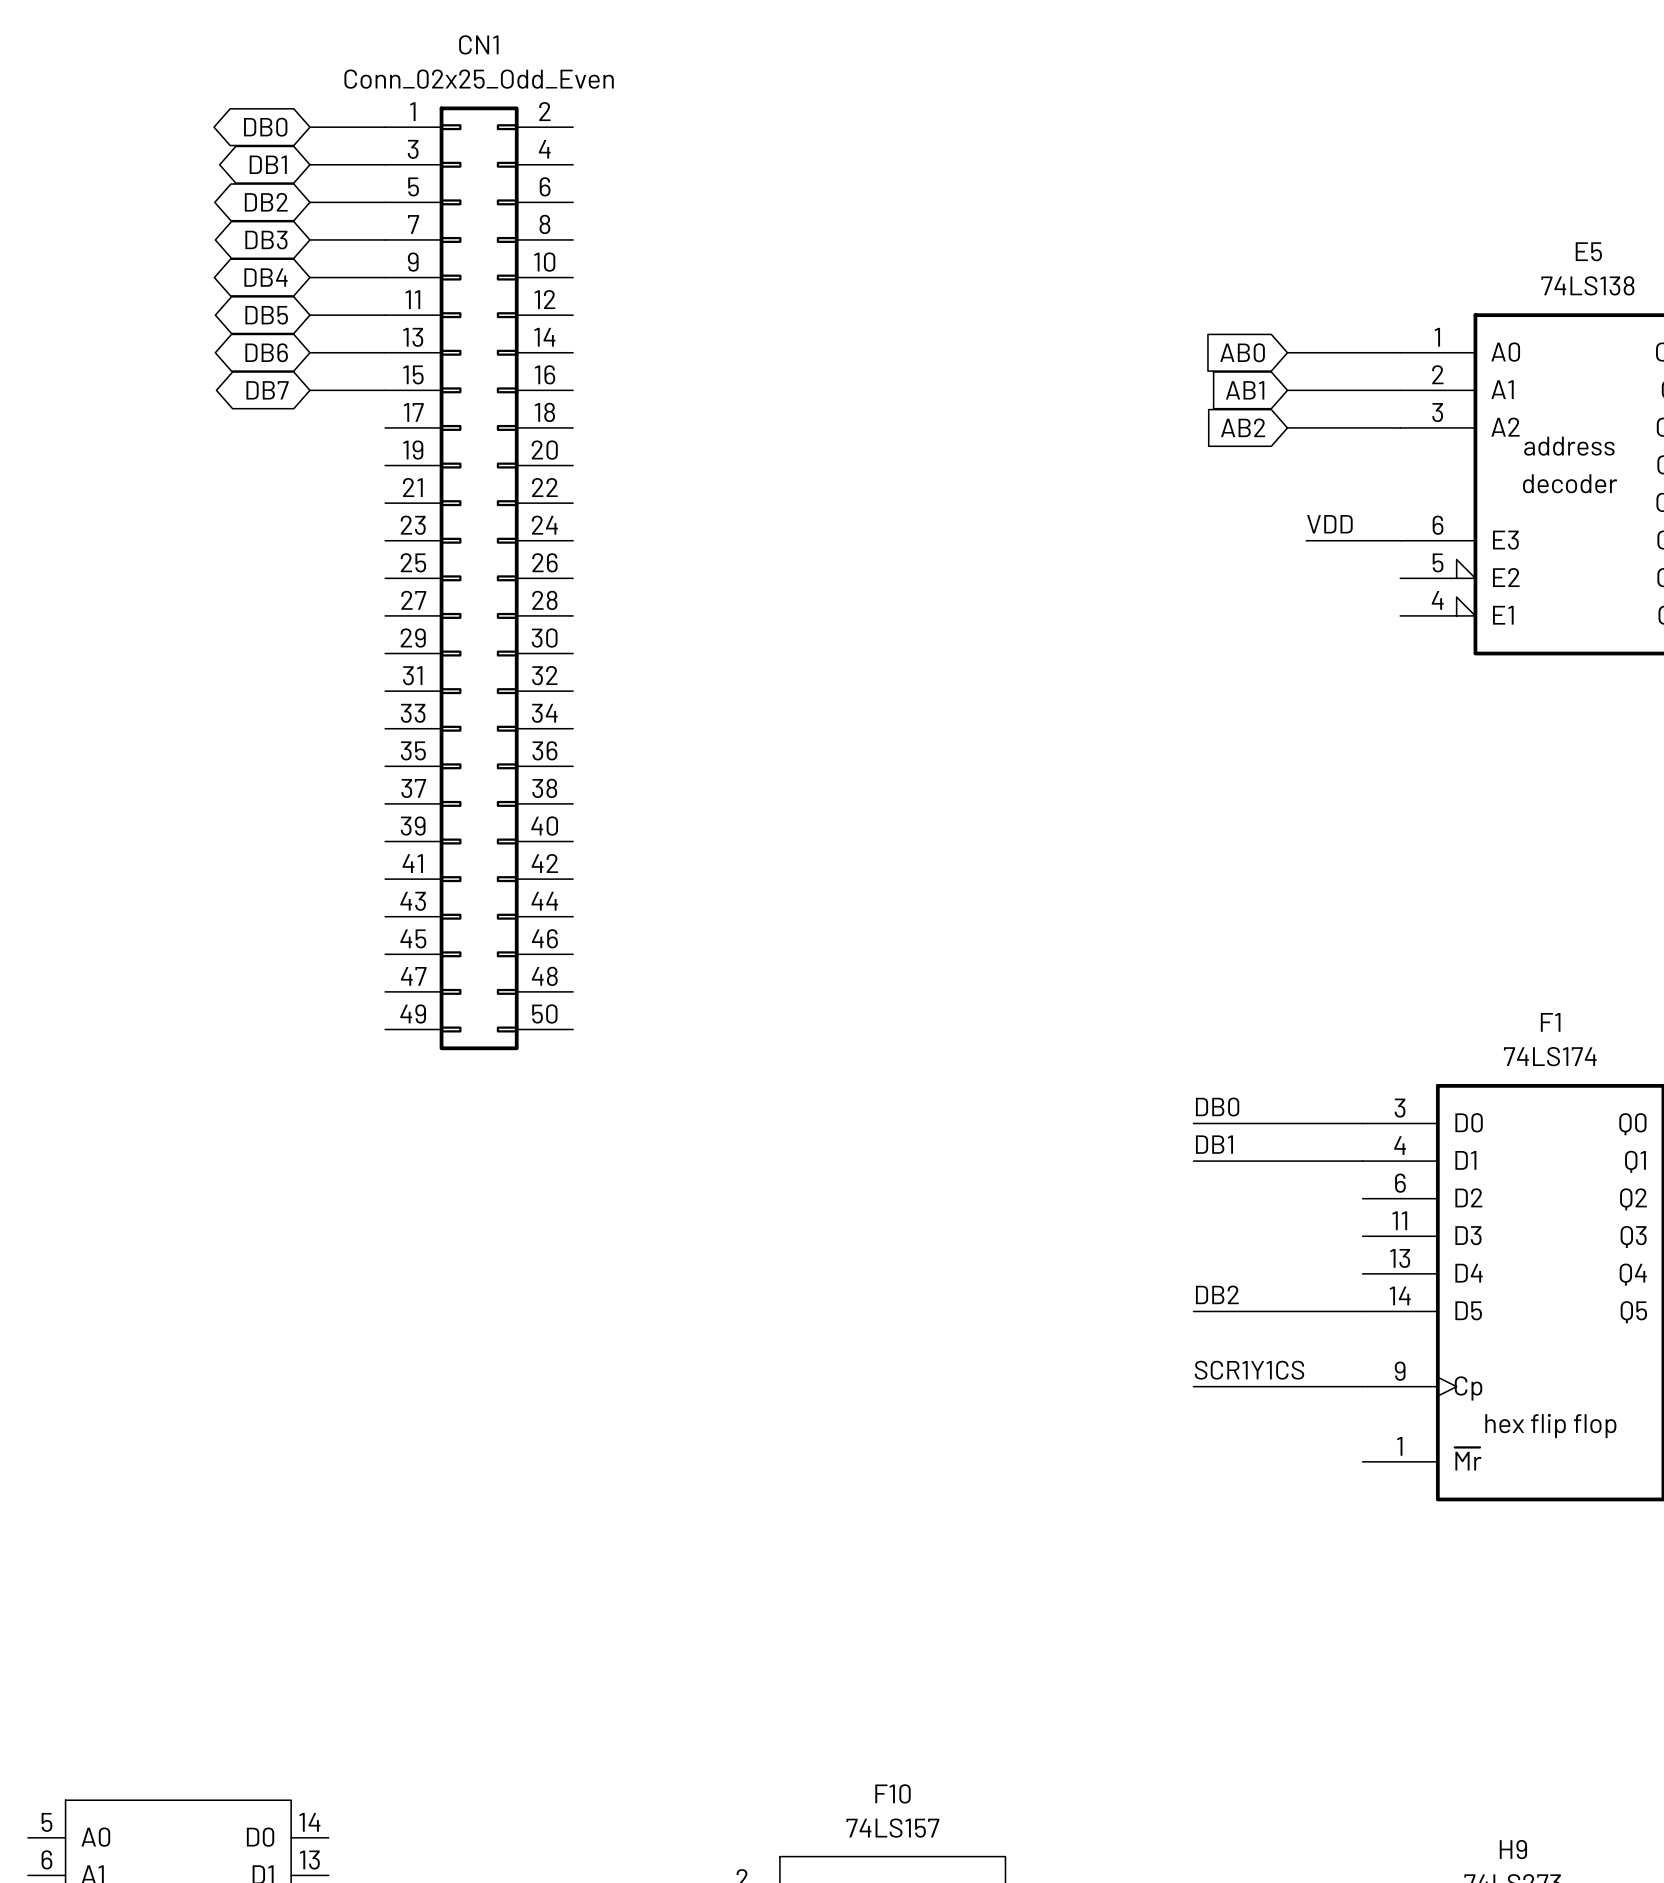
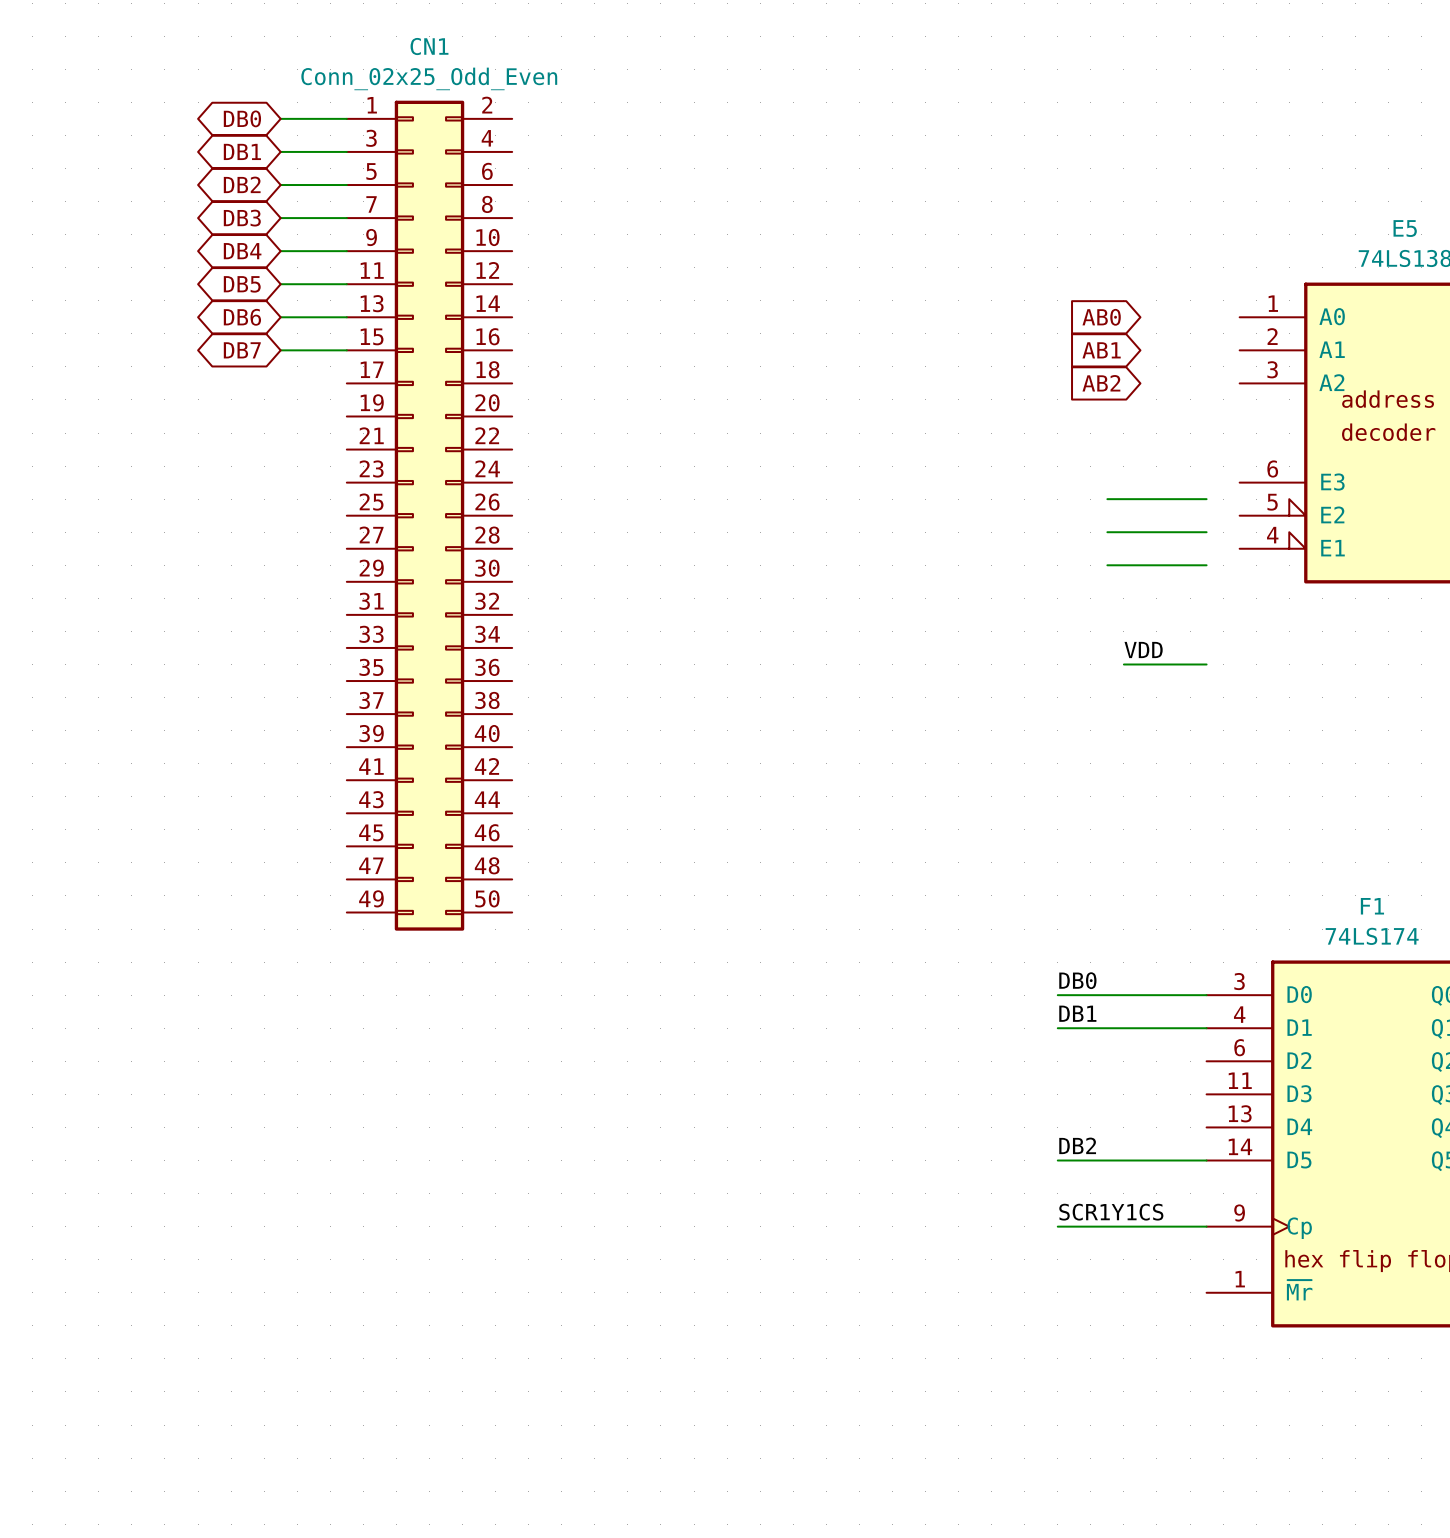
wire: (1287, 352) (1400, 352) -> (1107, 499) (1206, 499)
wire: (1287, 390) (1400, 390) -> (1107, 532) (1206, 532)
wire: (1287, 427) (1400, 427) -> (1107, 565) (1206, 565)
label position: VDD (1329, 524) -> VDD (1143, 649)
wire: (1306, 540) (1400, 540) -> (1123, 664) (1206, 664)

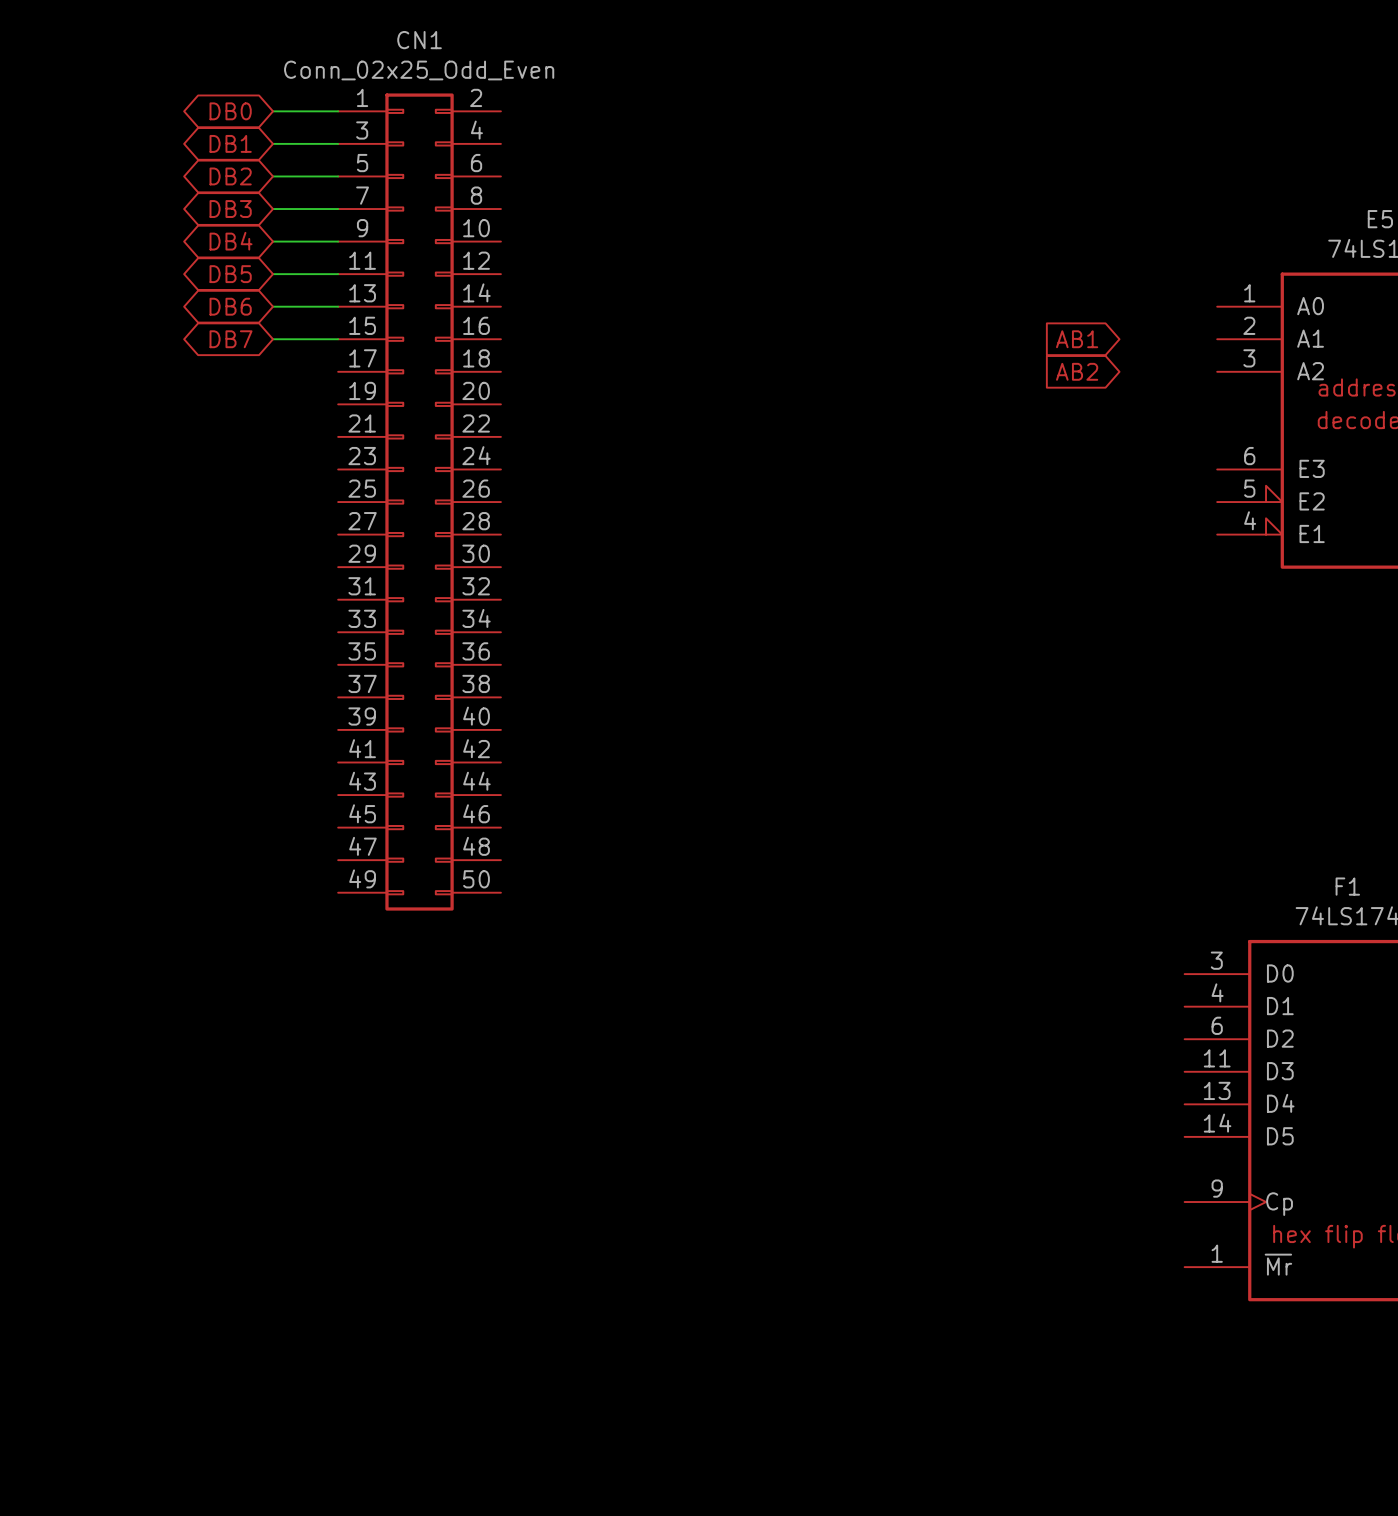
global label: AB0 (1101, 317) -> none
wire: (1107, 499) (1206, 499) -> none
wire: (1107, 532) (1206, 532) -> none
wire: (1107, 565) (1206, 565) -> none
label: VDD (1143, 649) -> none
wire: (1123, 664) (1206, 664) -> none
label: DB0 (1077, 980) -> none
wire: (1057, 995) (1206, 995) -> none
label: DB1 (1077, 1013) -> none
wire: (1057, 1028) (1206, 1028) -> none
label: DB2 (1077, 1145) -> none
wire: (1057, 1160) (1206, 1160) -> none
label: SCR1Y1CS (1111, 1212) -> none
wire: (1057, 1226) (1206, 1226) -> none

